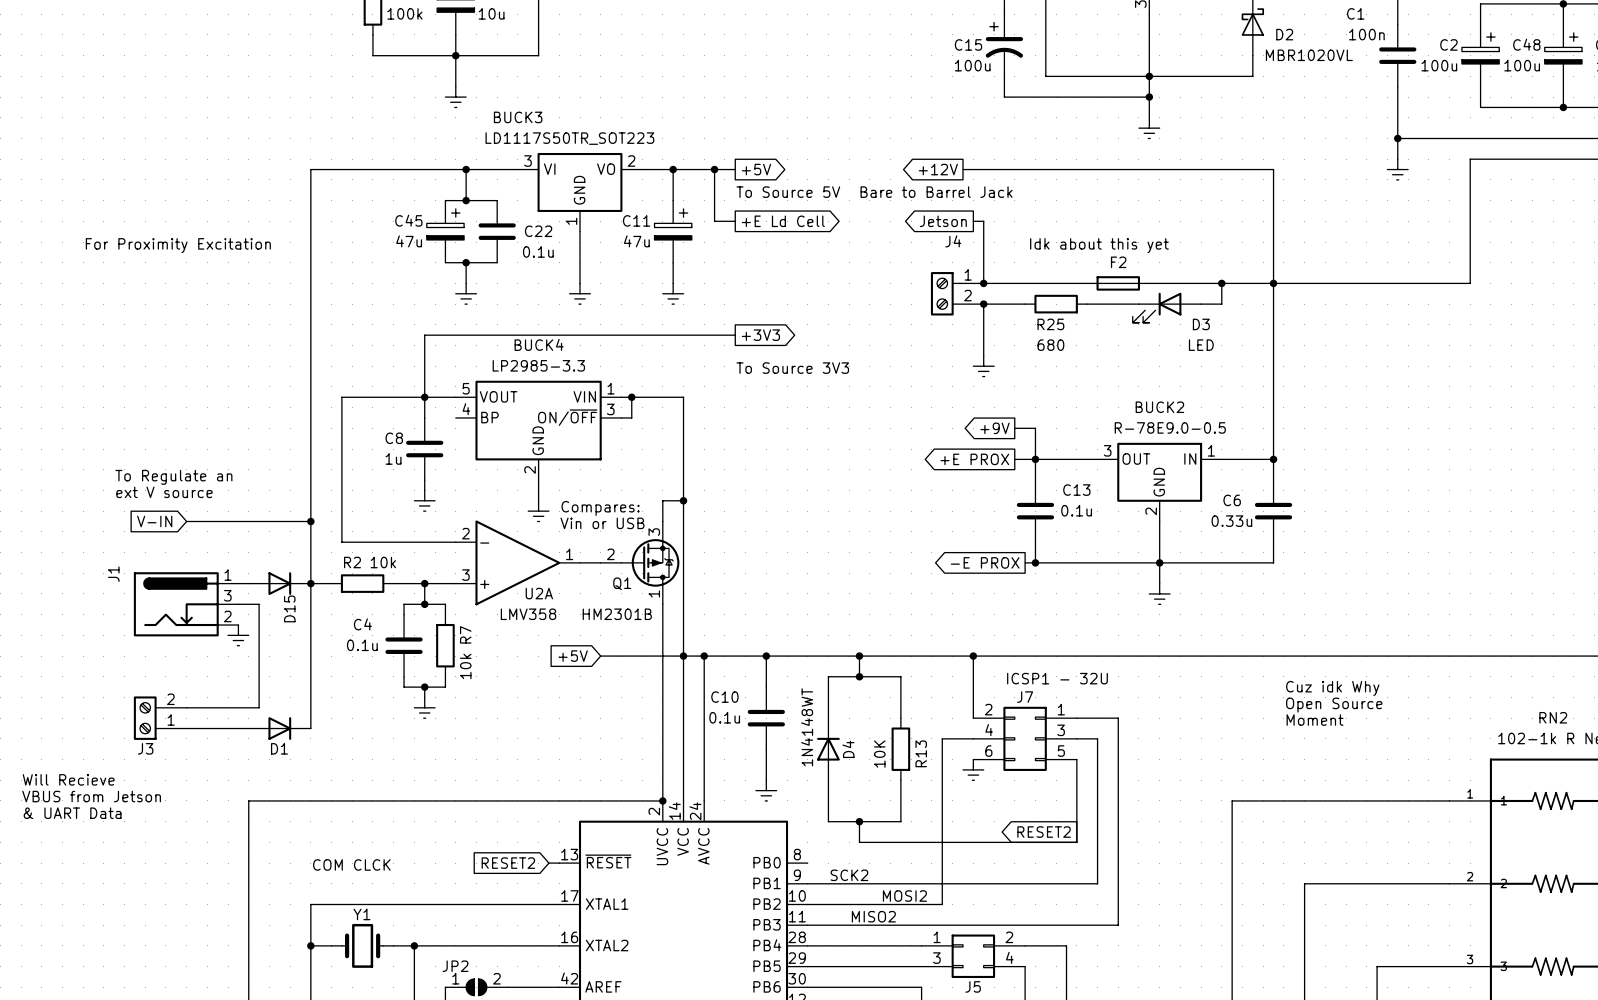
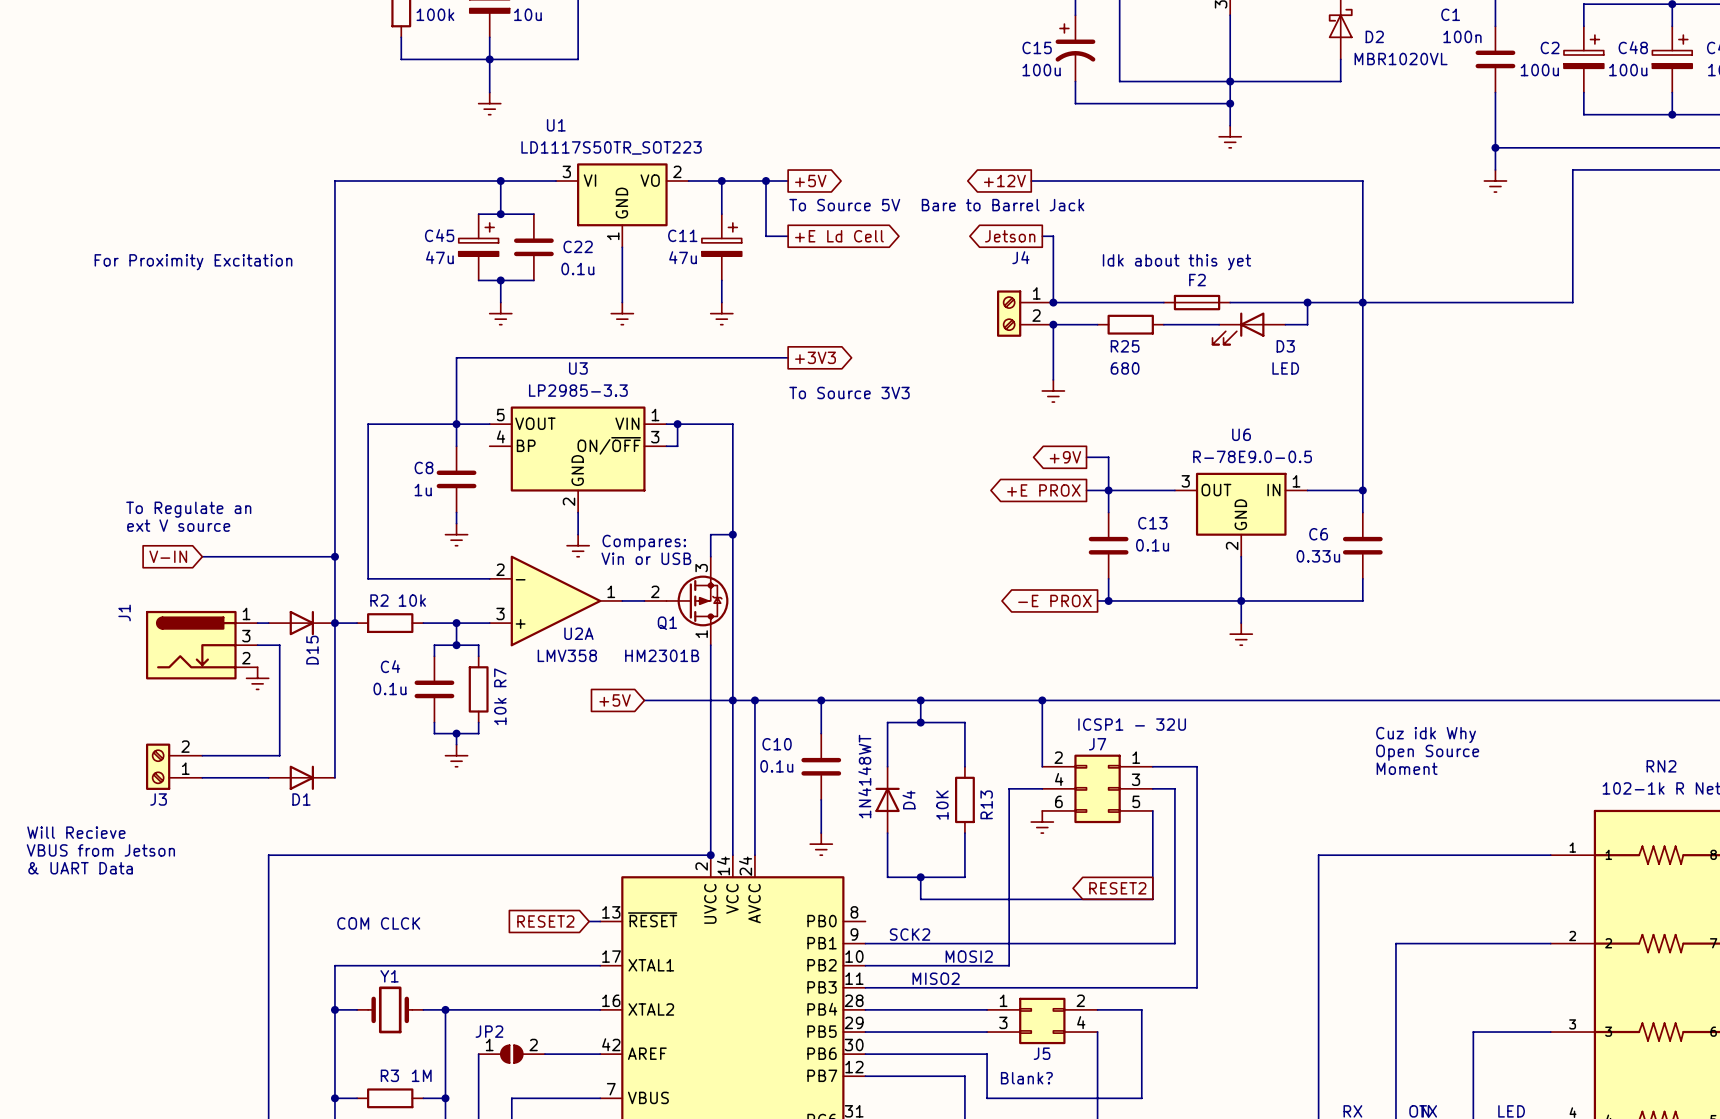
BUCK3 name: BUCK3 (518, 117) -> U1 (556, 125)
BUCK4 name: BUCK4 (539, 344) -> U3 (578, 368)
BUCK2 name: BUCK2 (1159, 407) -> U6 (1241, 434)

